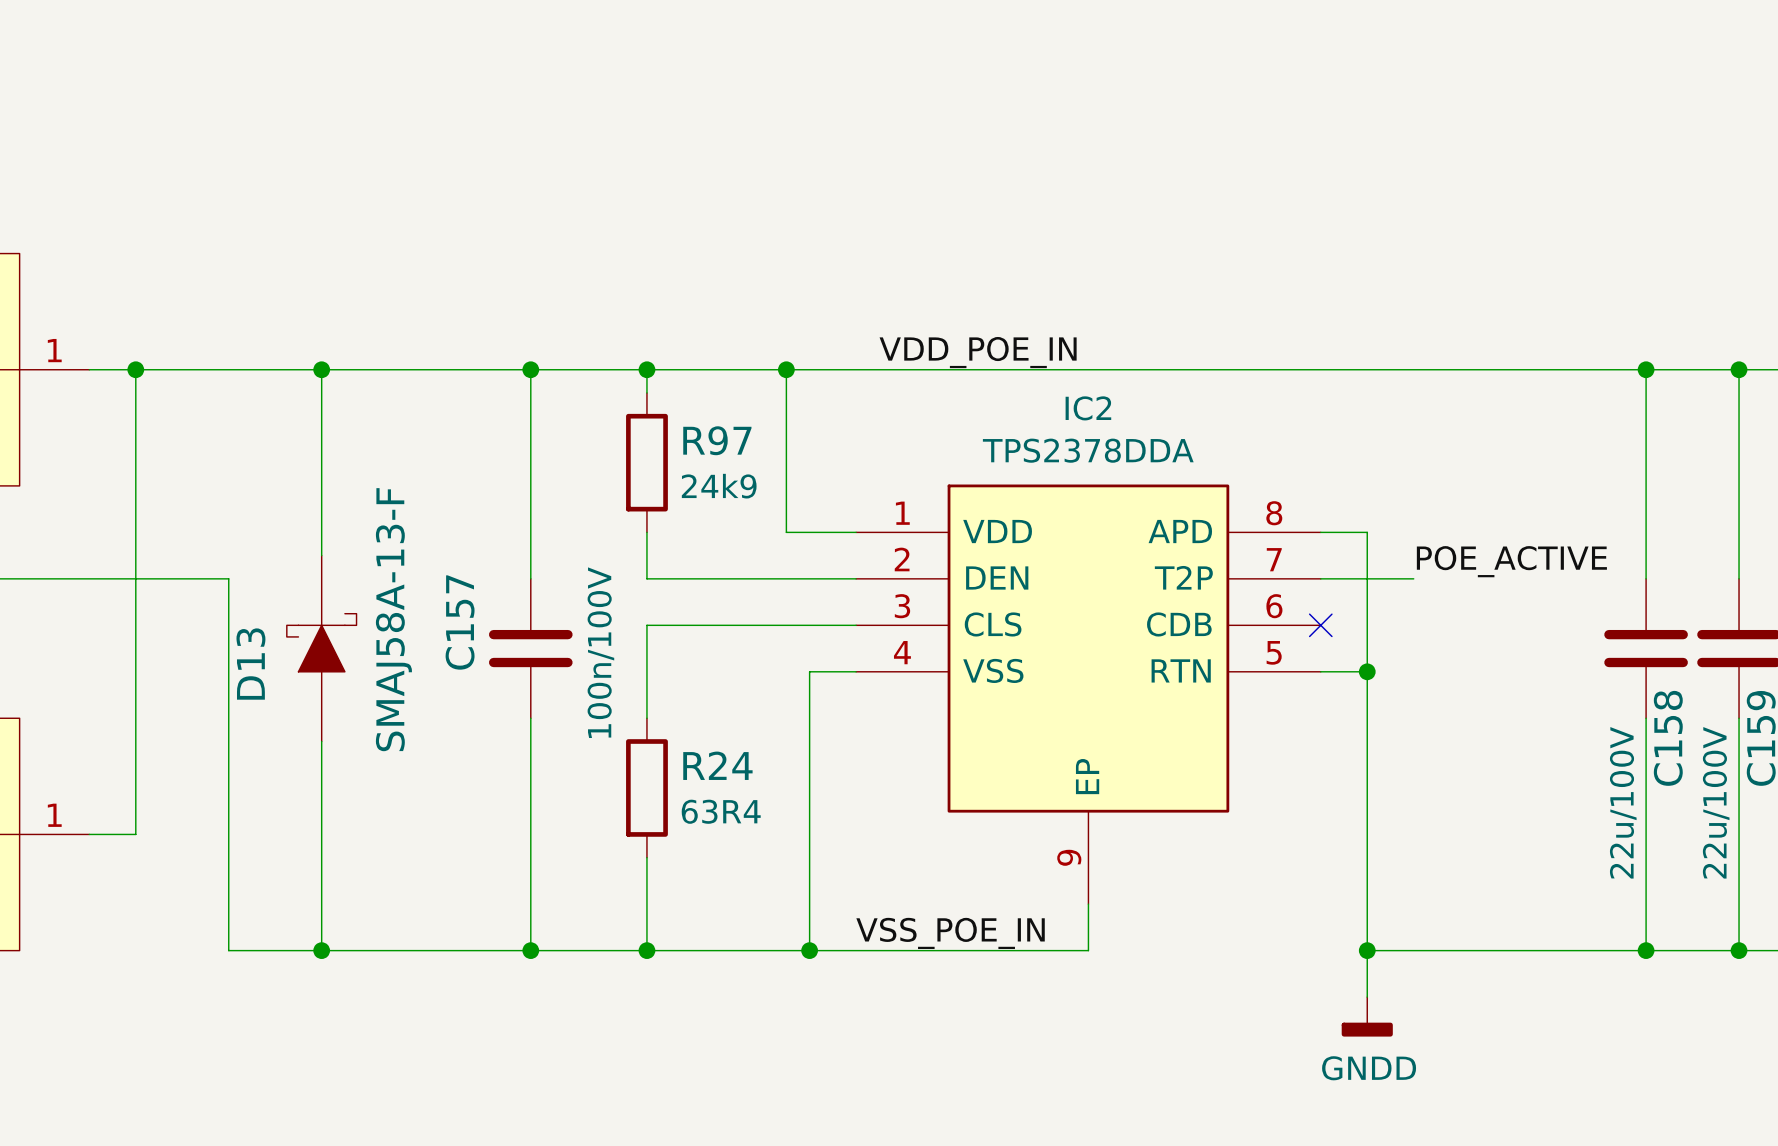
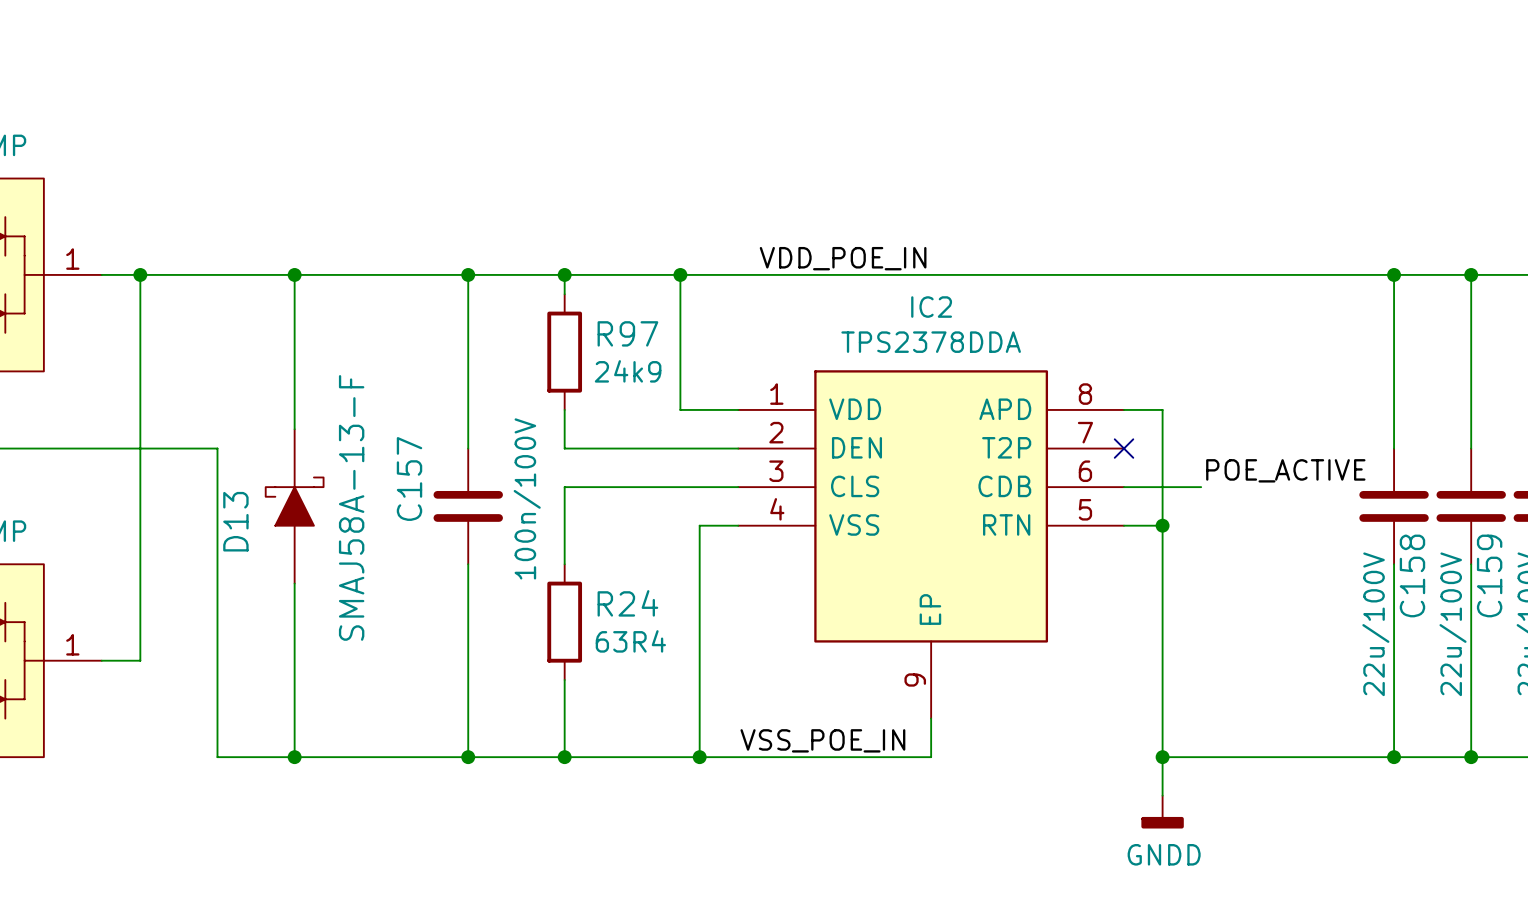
label position: POE_ACTIVE (1511, 561) -> POE_ACTIVE (1285, 470)
wire: (1320, 578) (1413, 578) -> (1124, 487) (1201, 487)
no-connect mark position: (1320, 625) -> (1124, 448)

